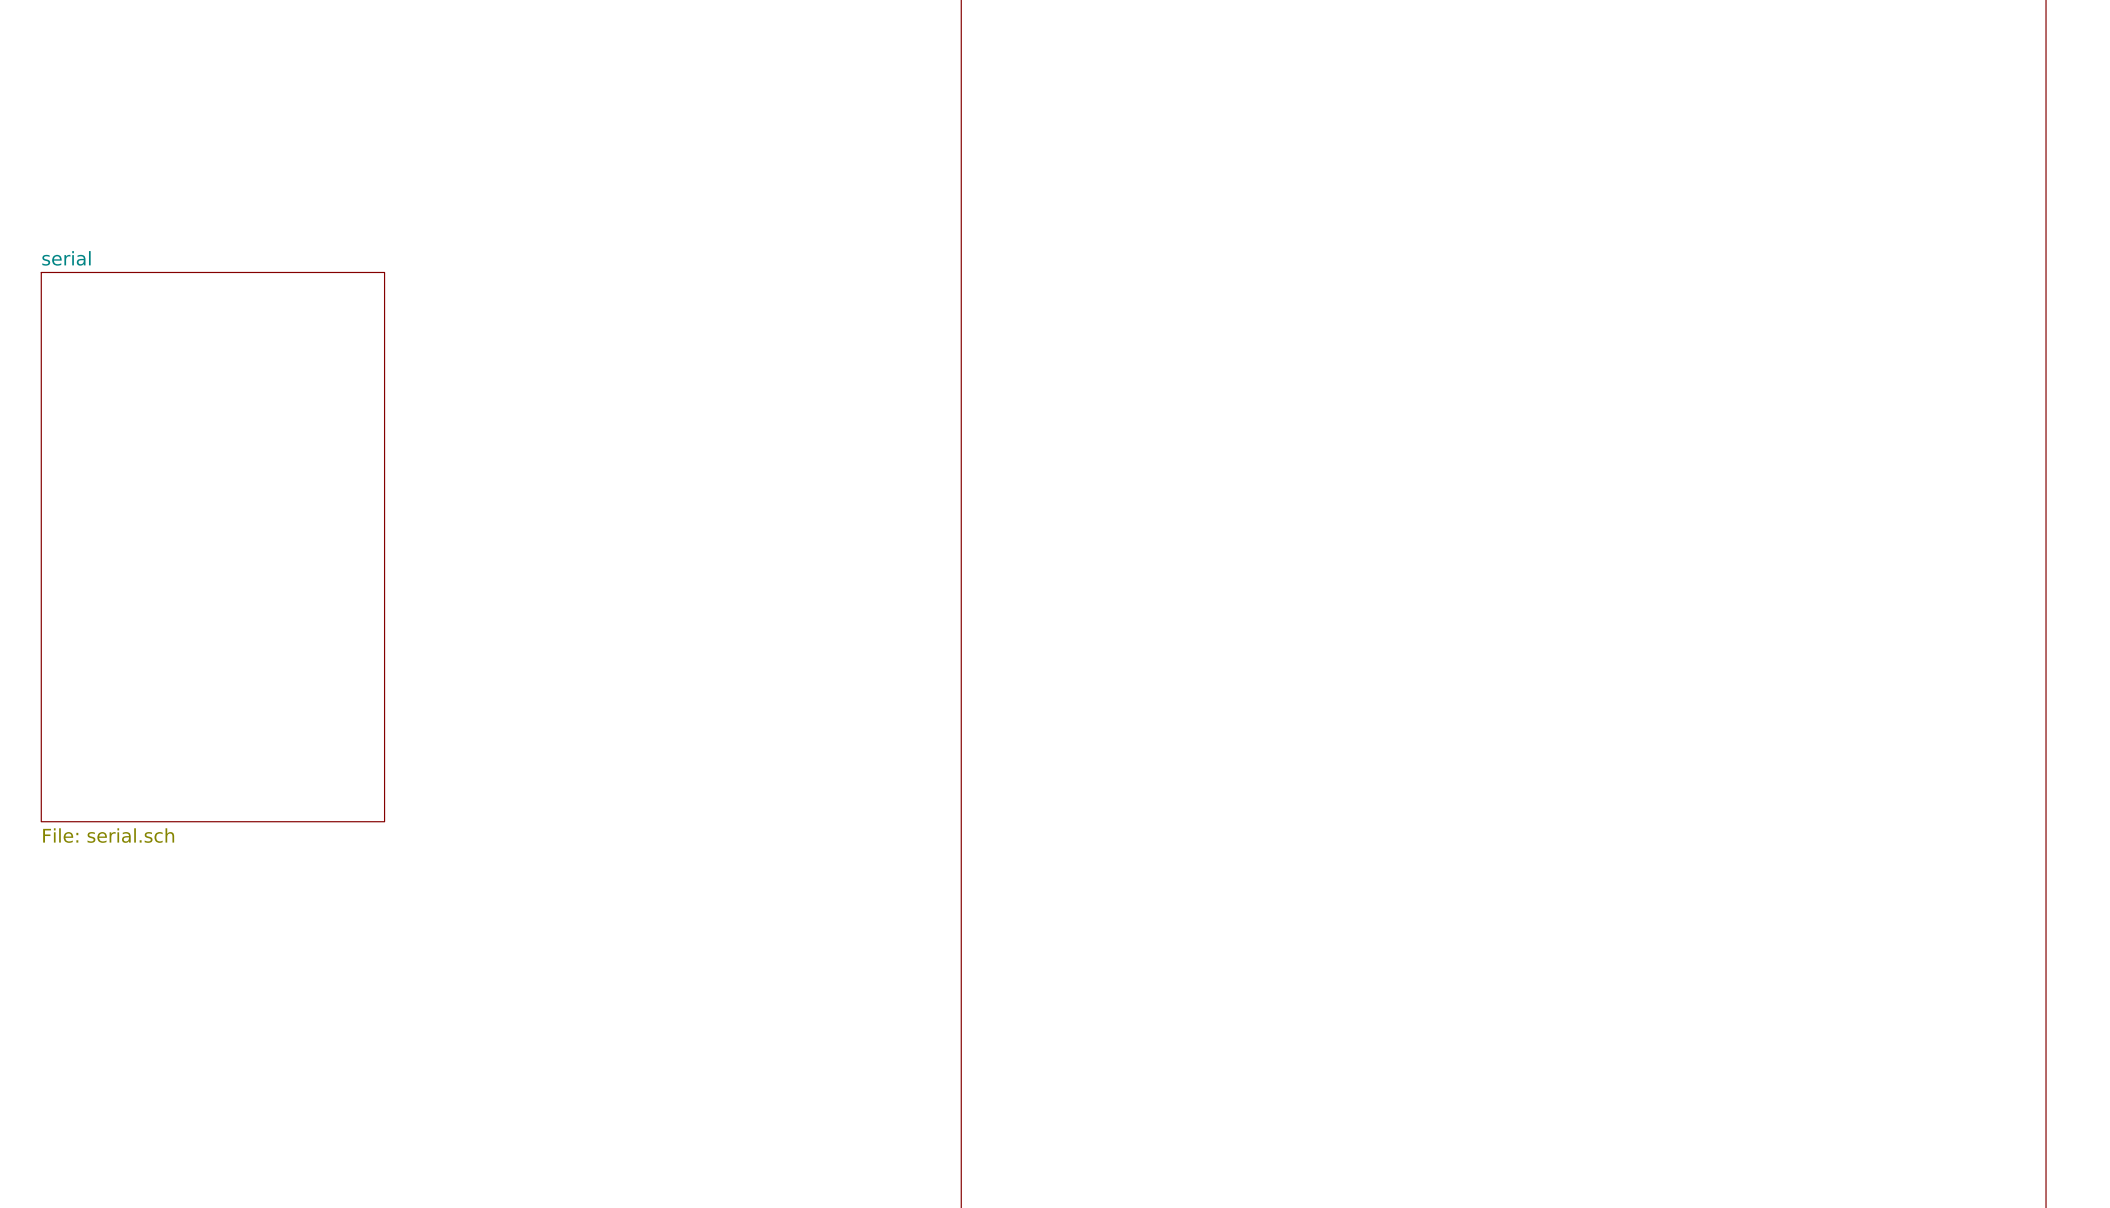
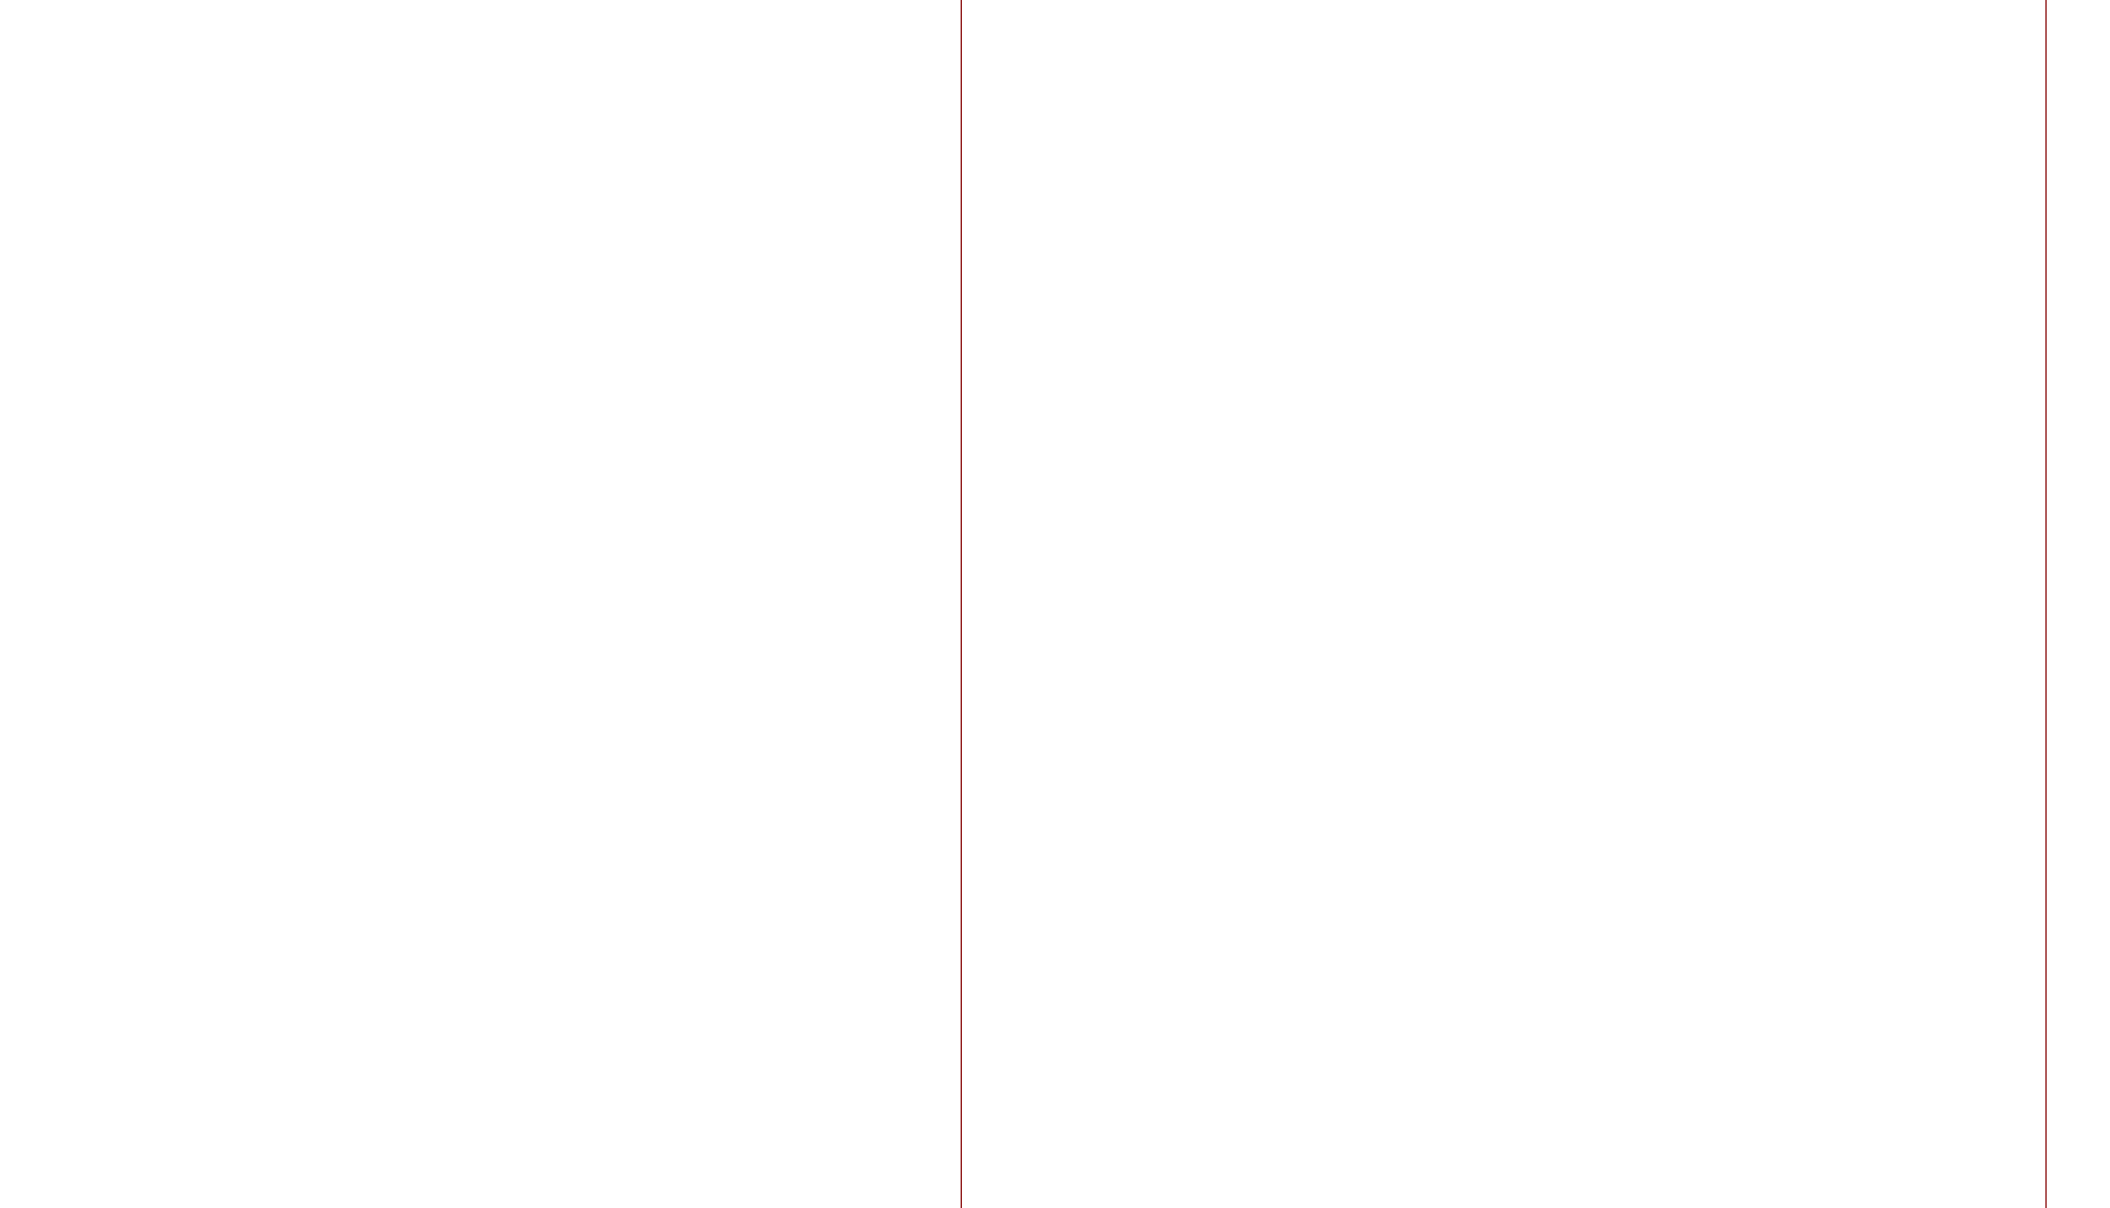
sheet serial: File: serial.sch (212, 547) -> none

